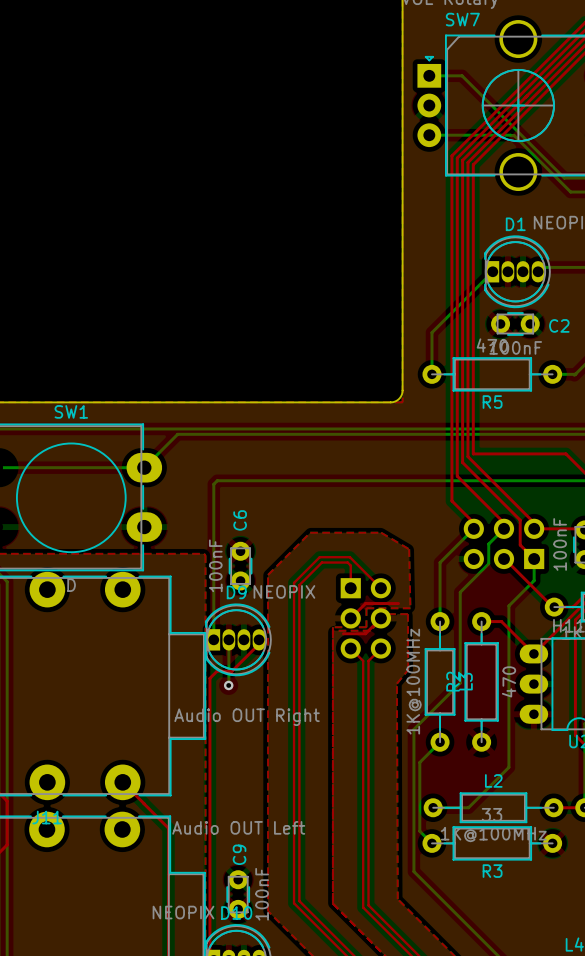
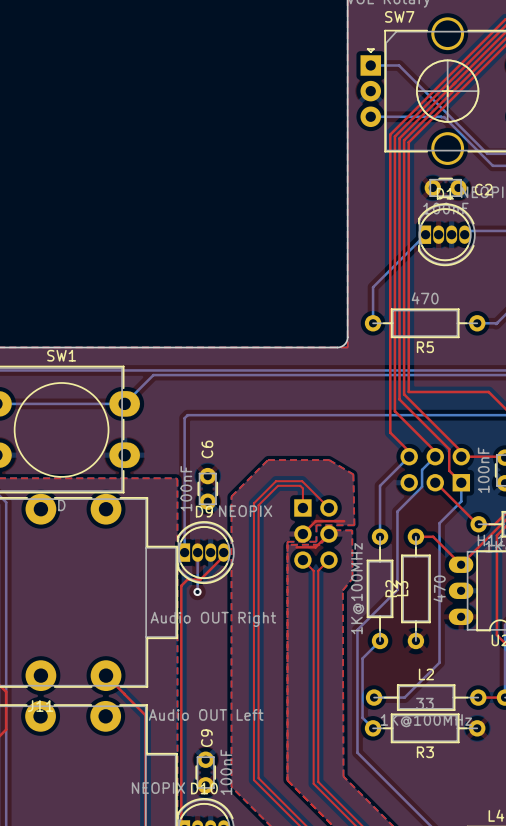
C2 position: (515, 324) -> (445, 187)

